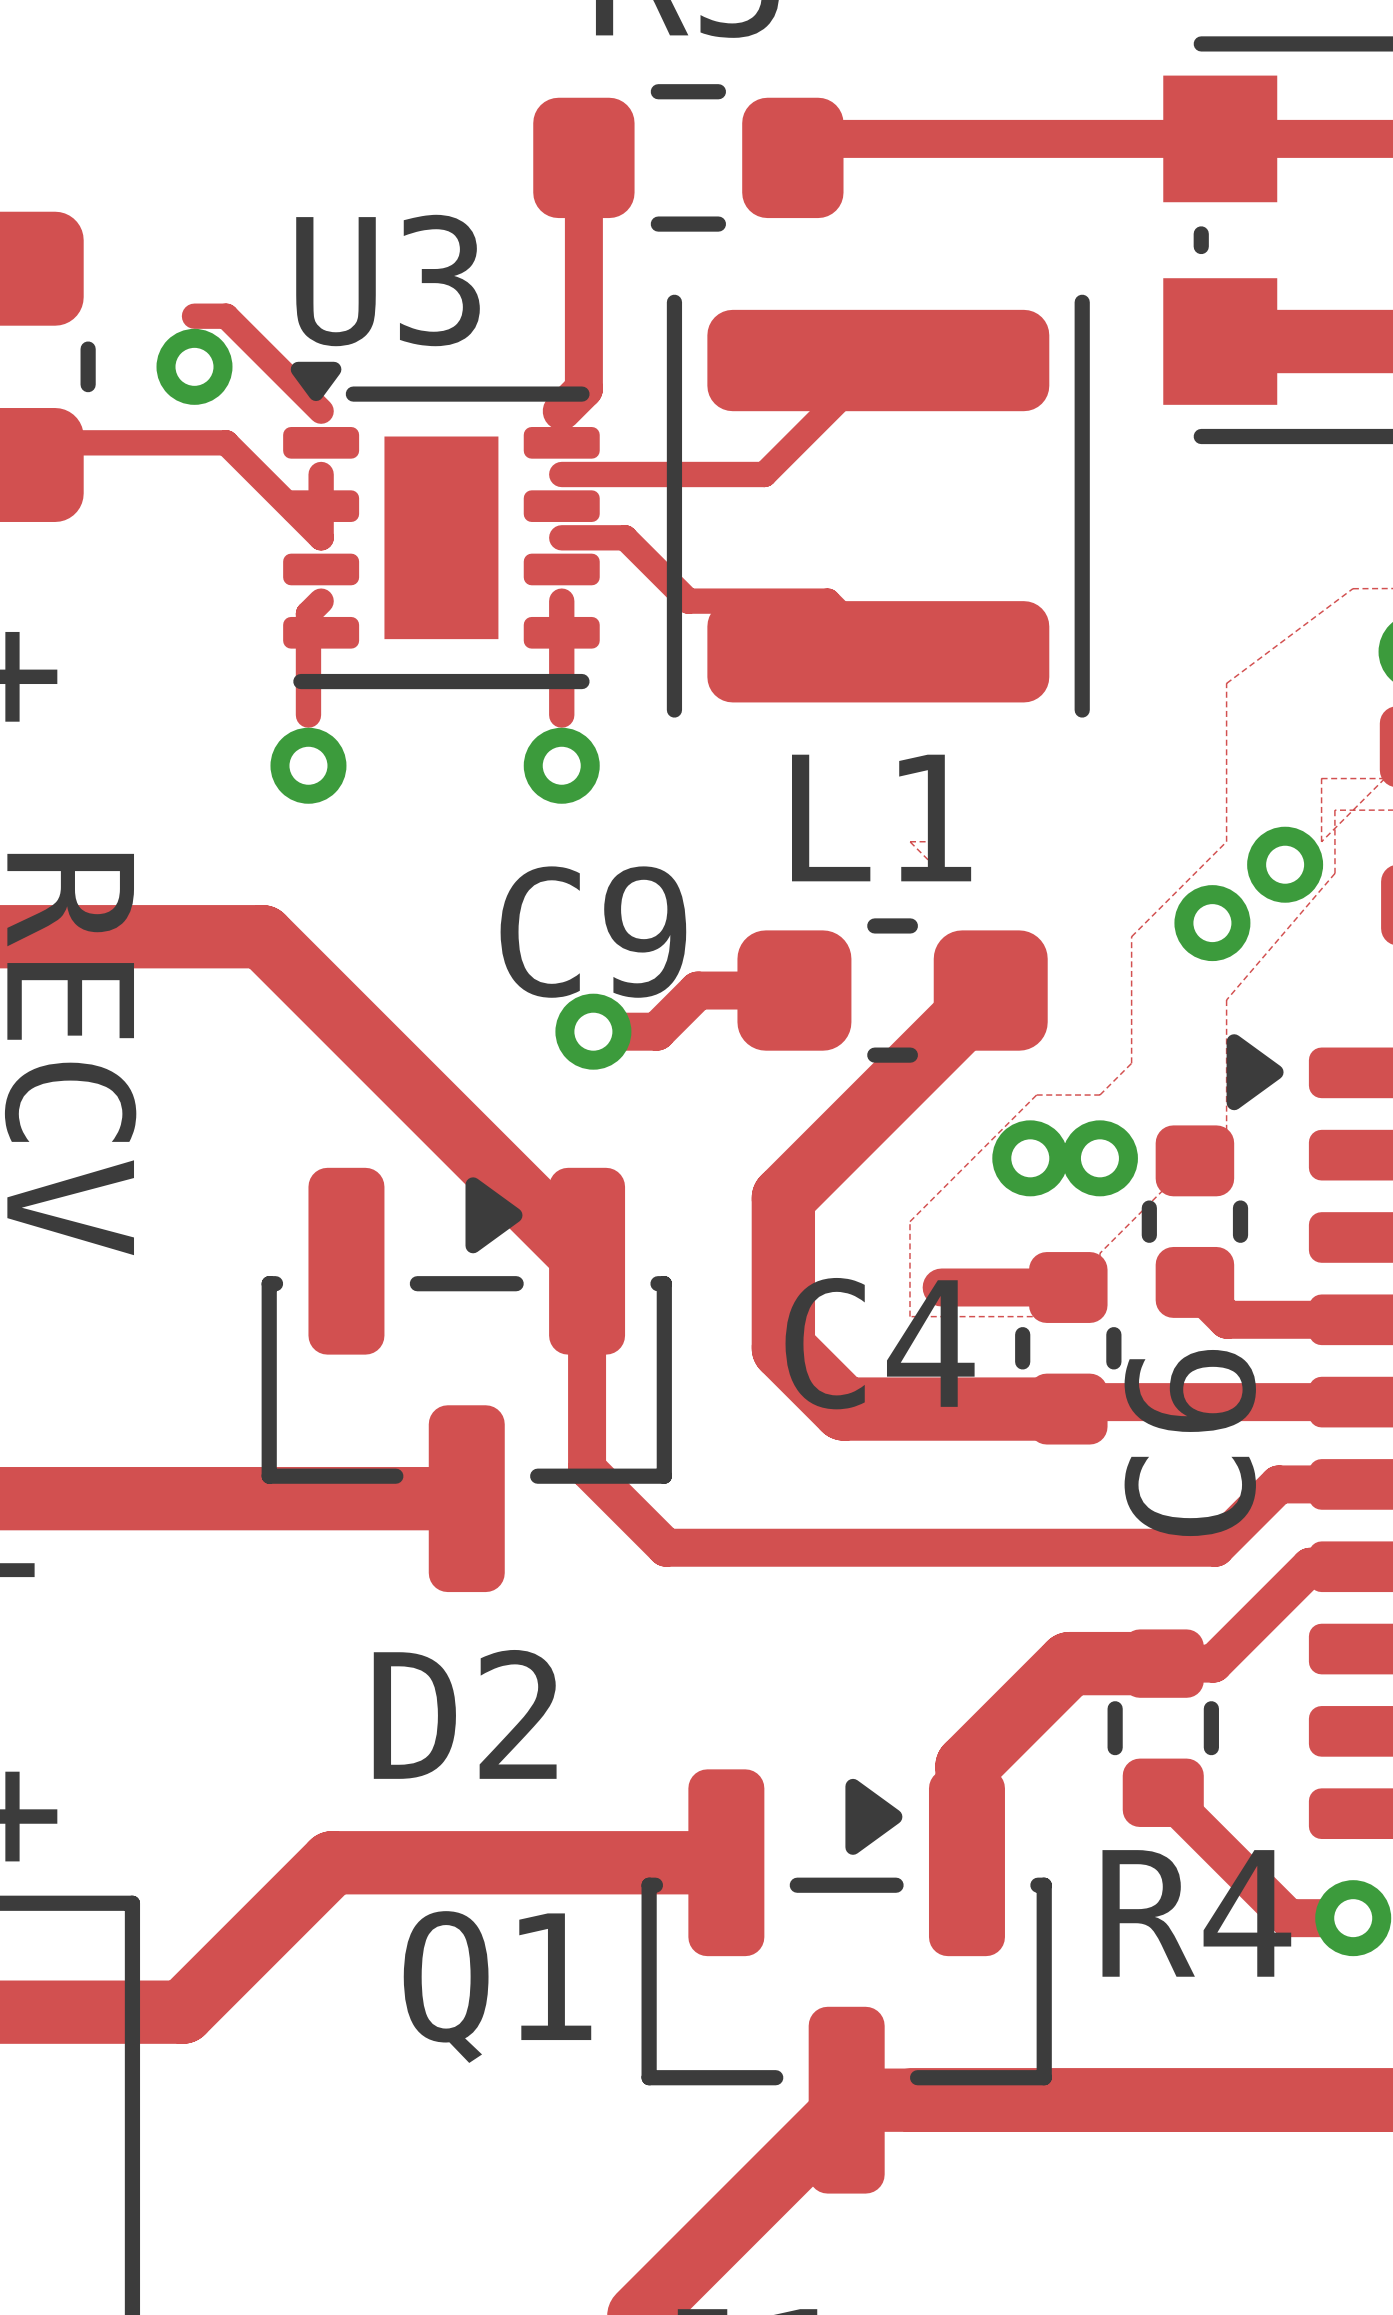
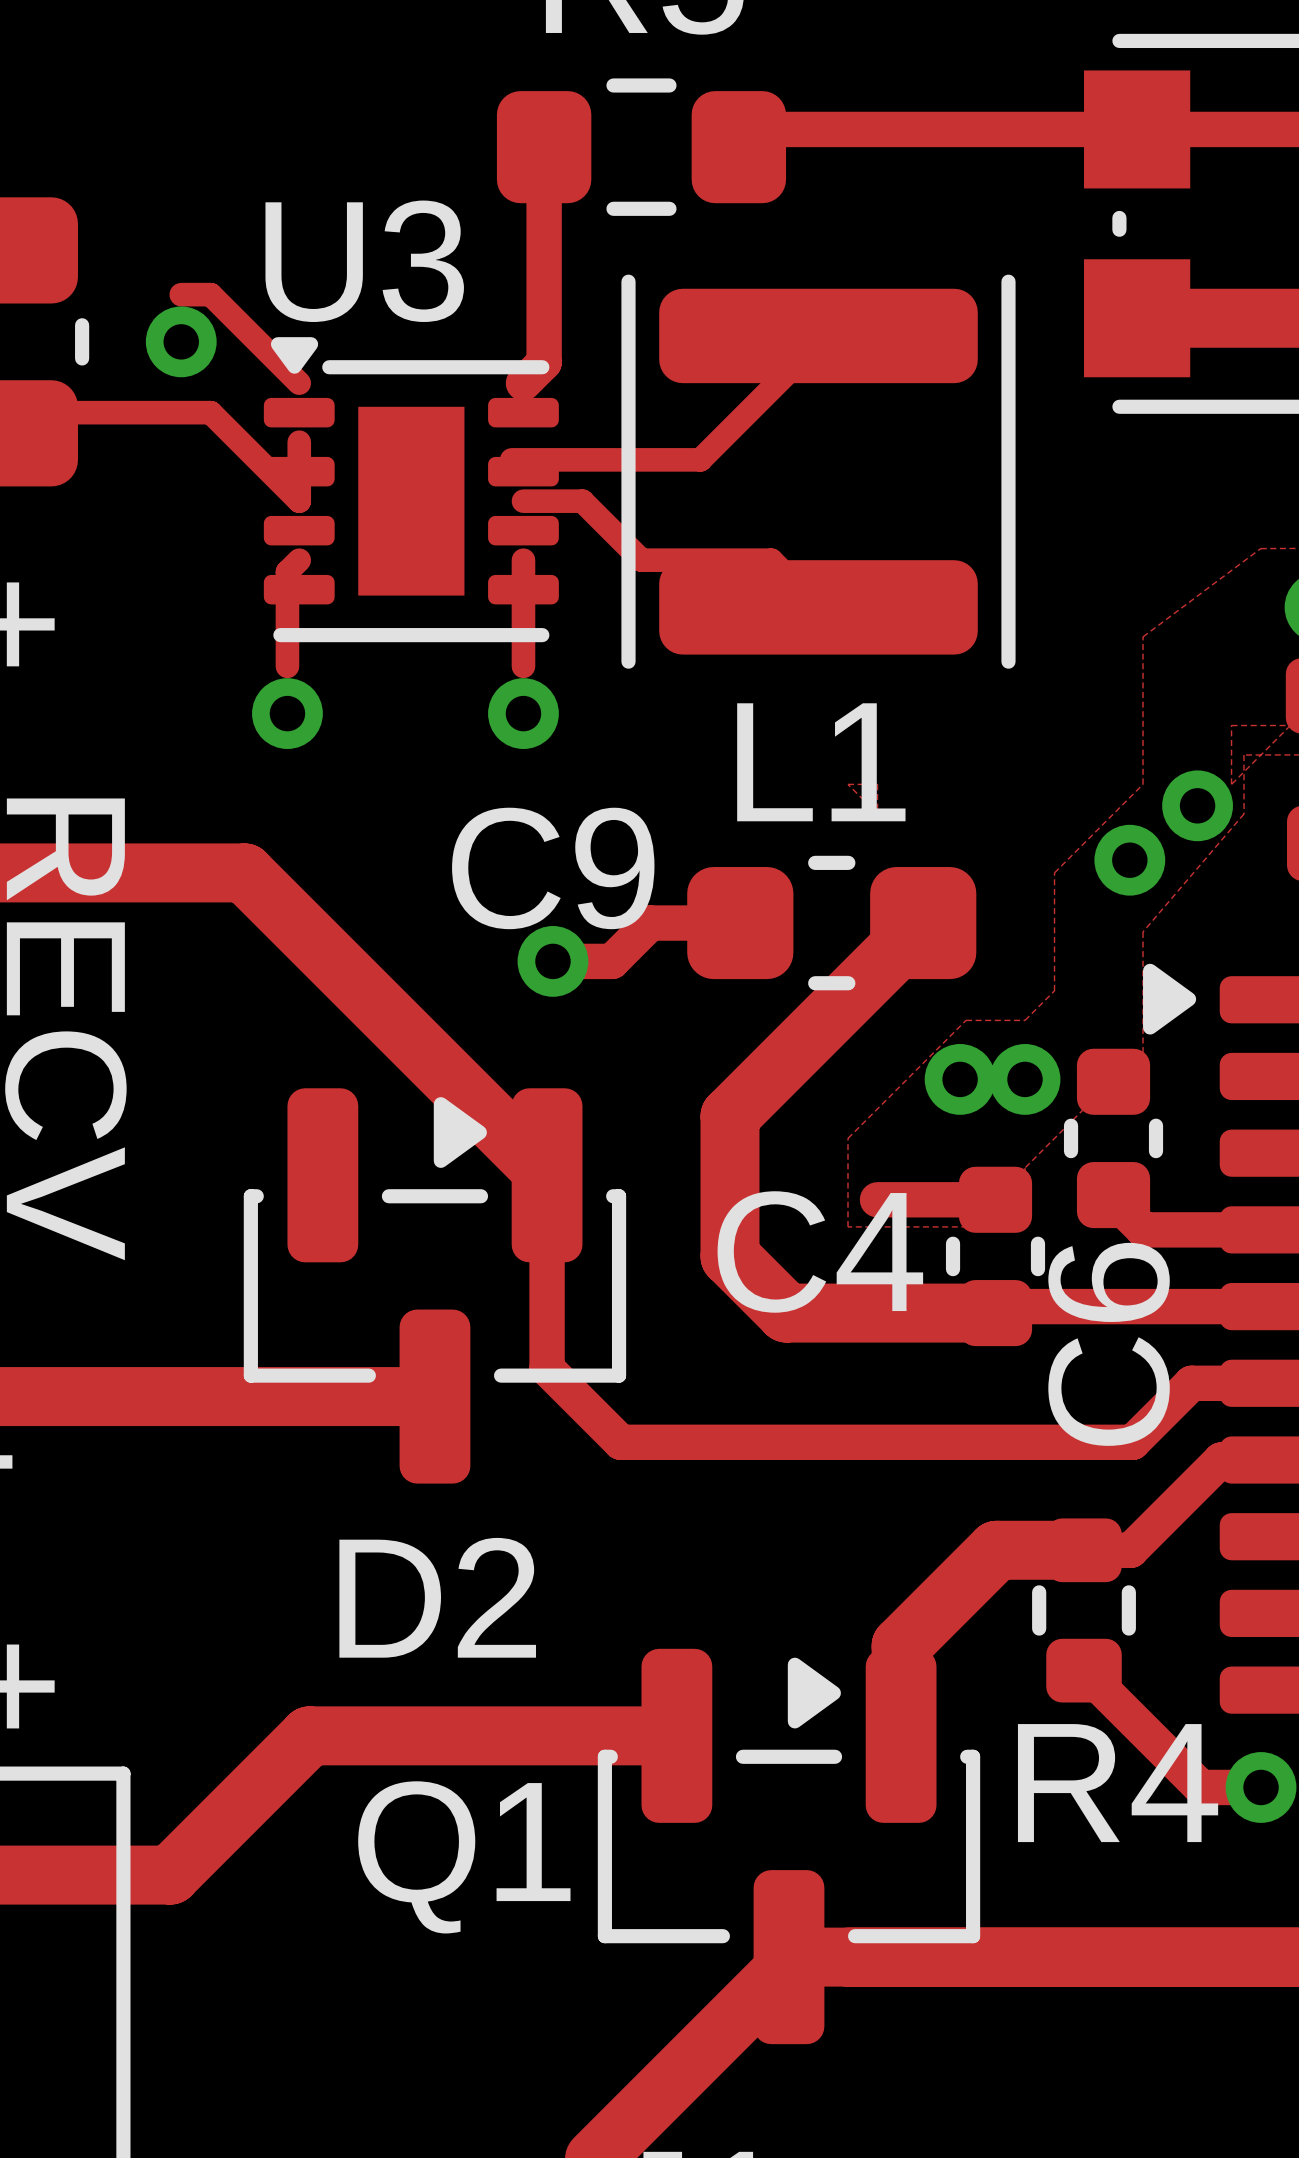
track: (878, 360) (764, 474) (561, 474) -> (806, 353) (700, 459) (511, 459)

